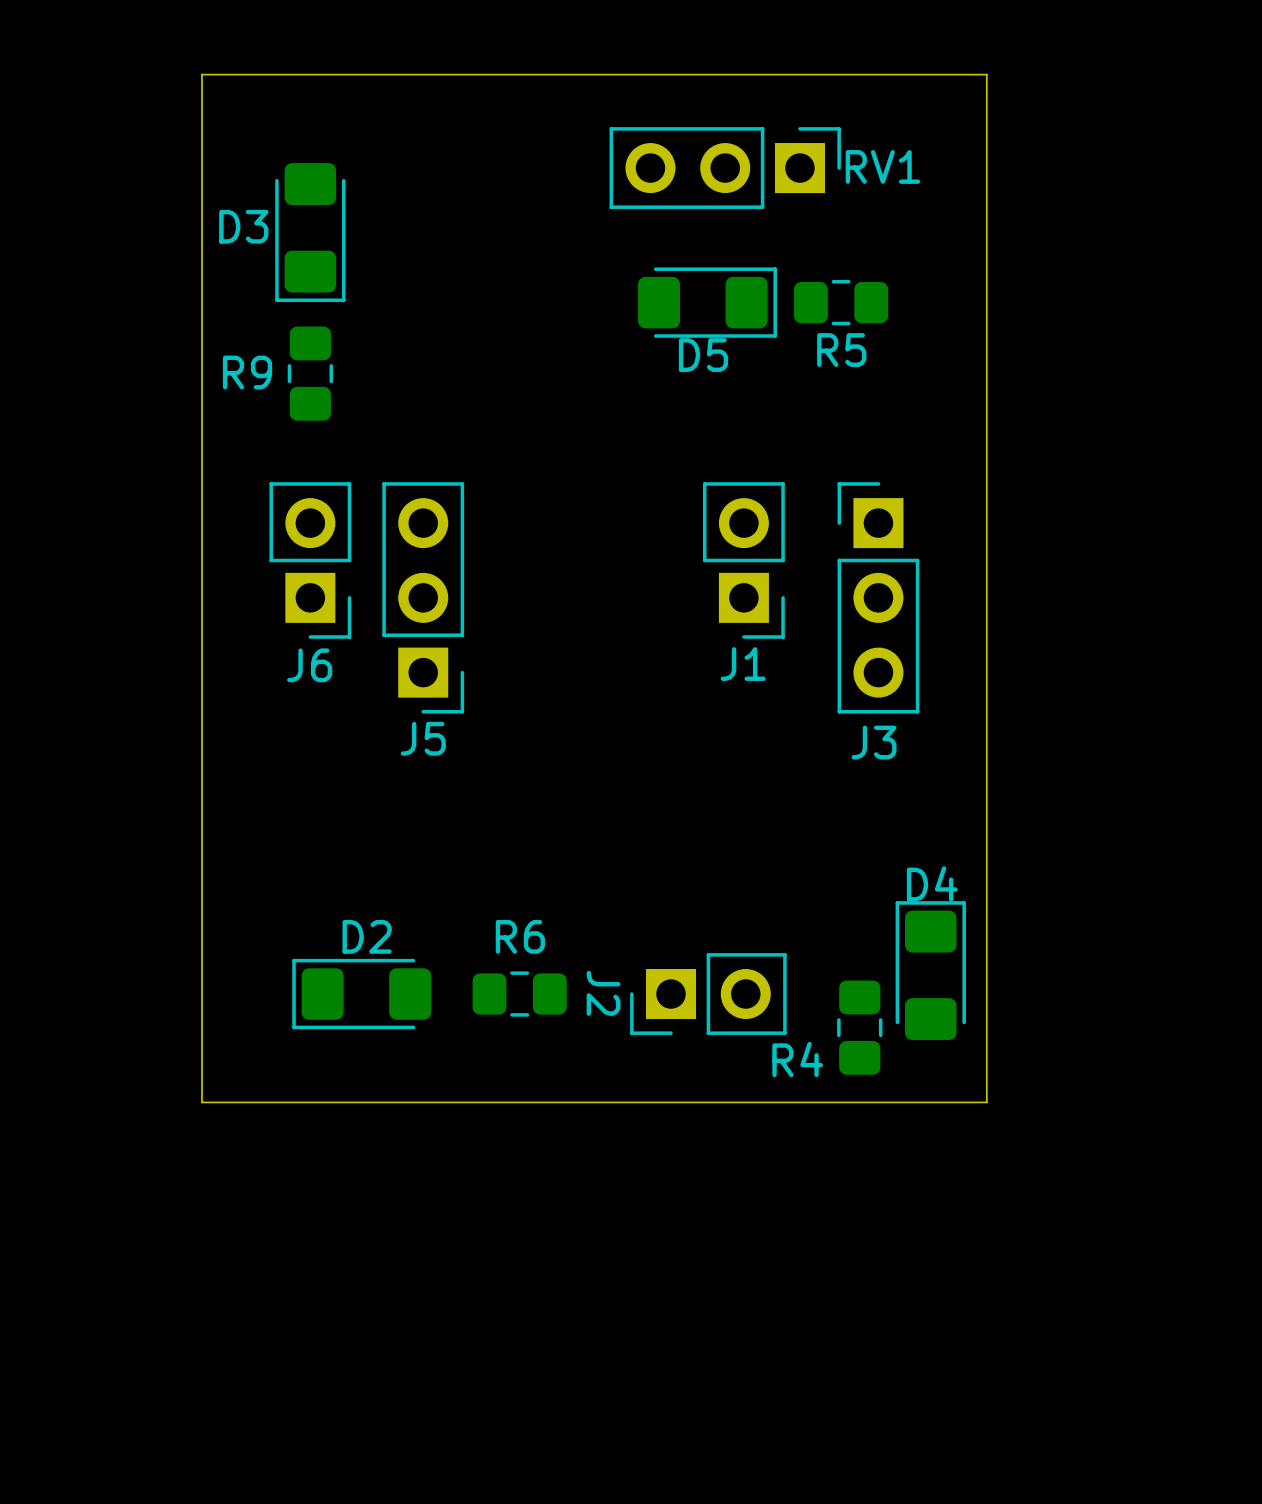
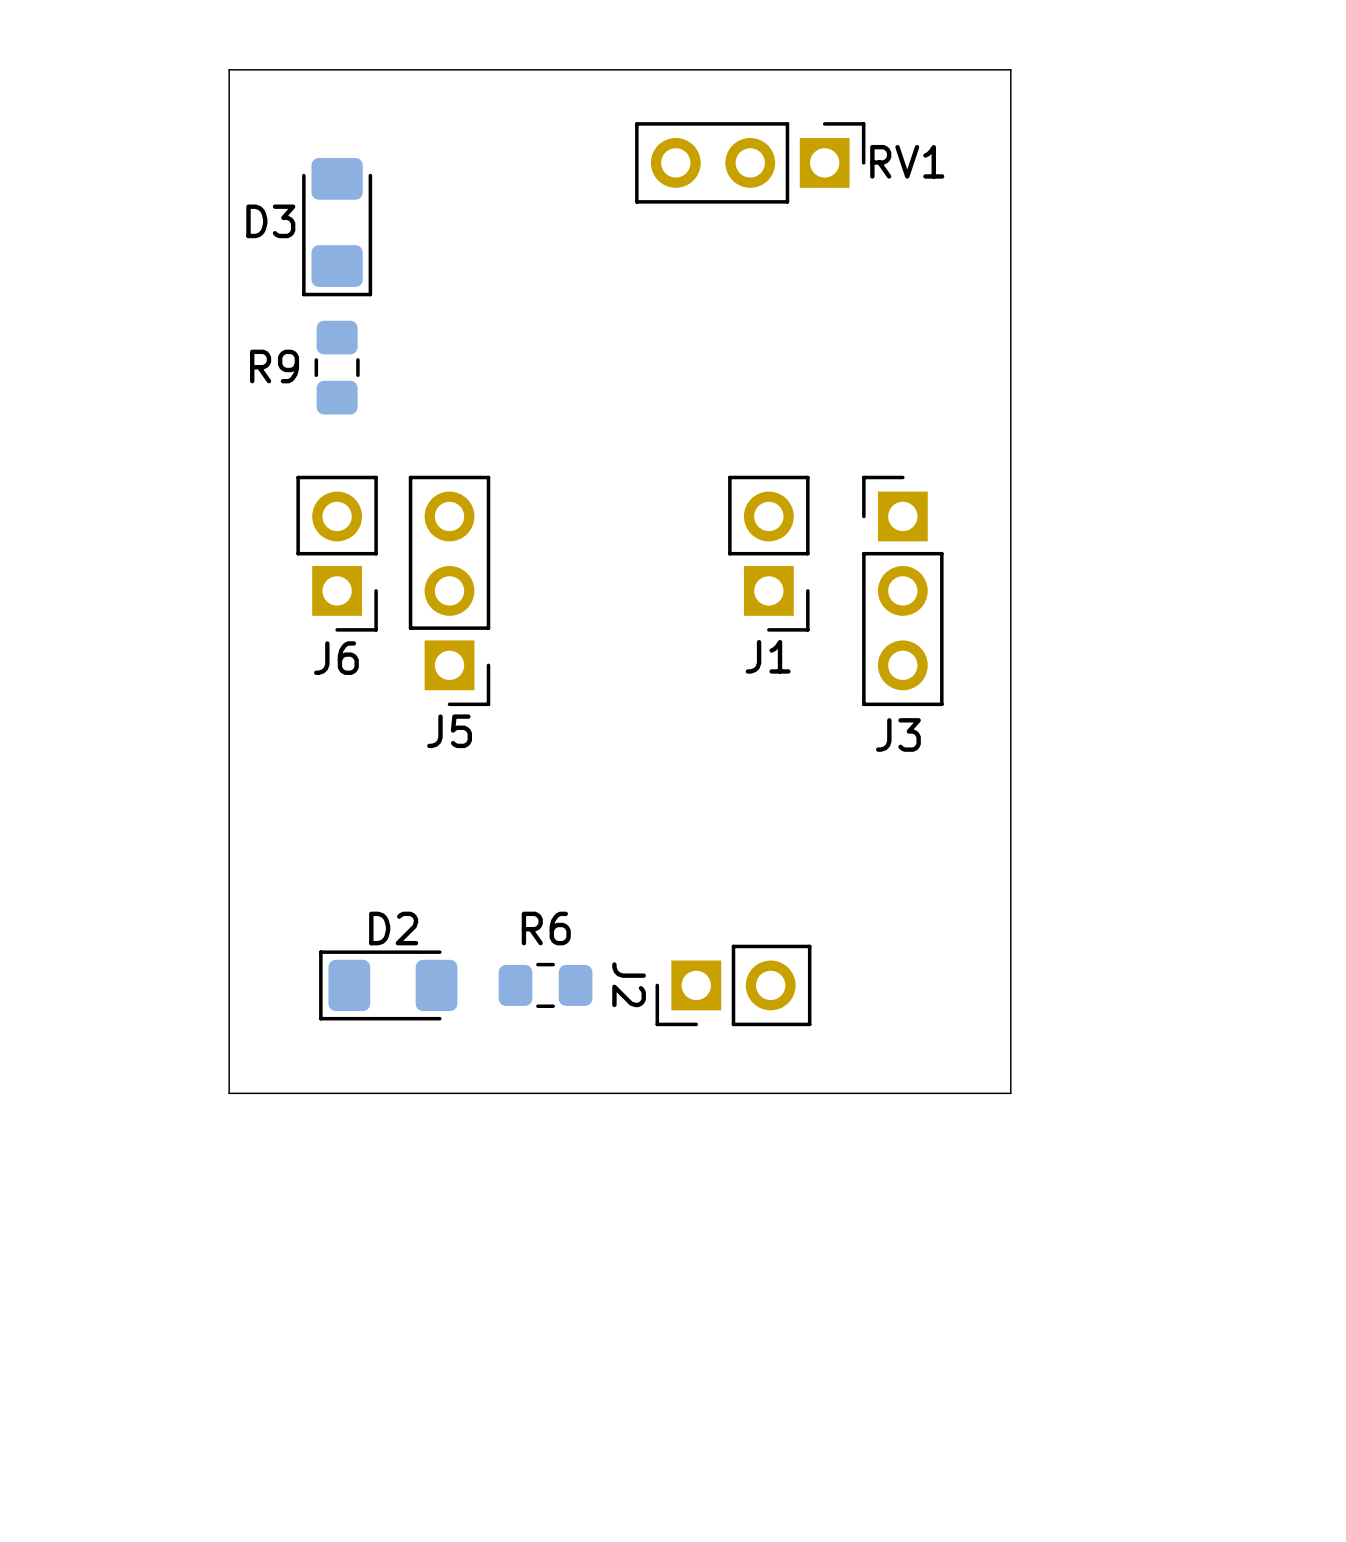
D5: (707, 302) -> none
R5: (841, 302) -> none
D4: (930, 970) -> none
R4: (859, 1027) -> none

